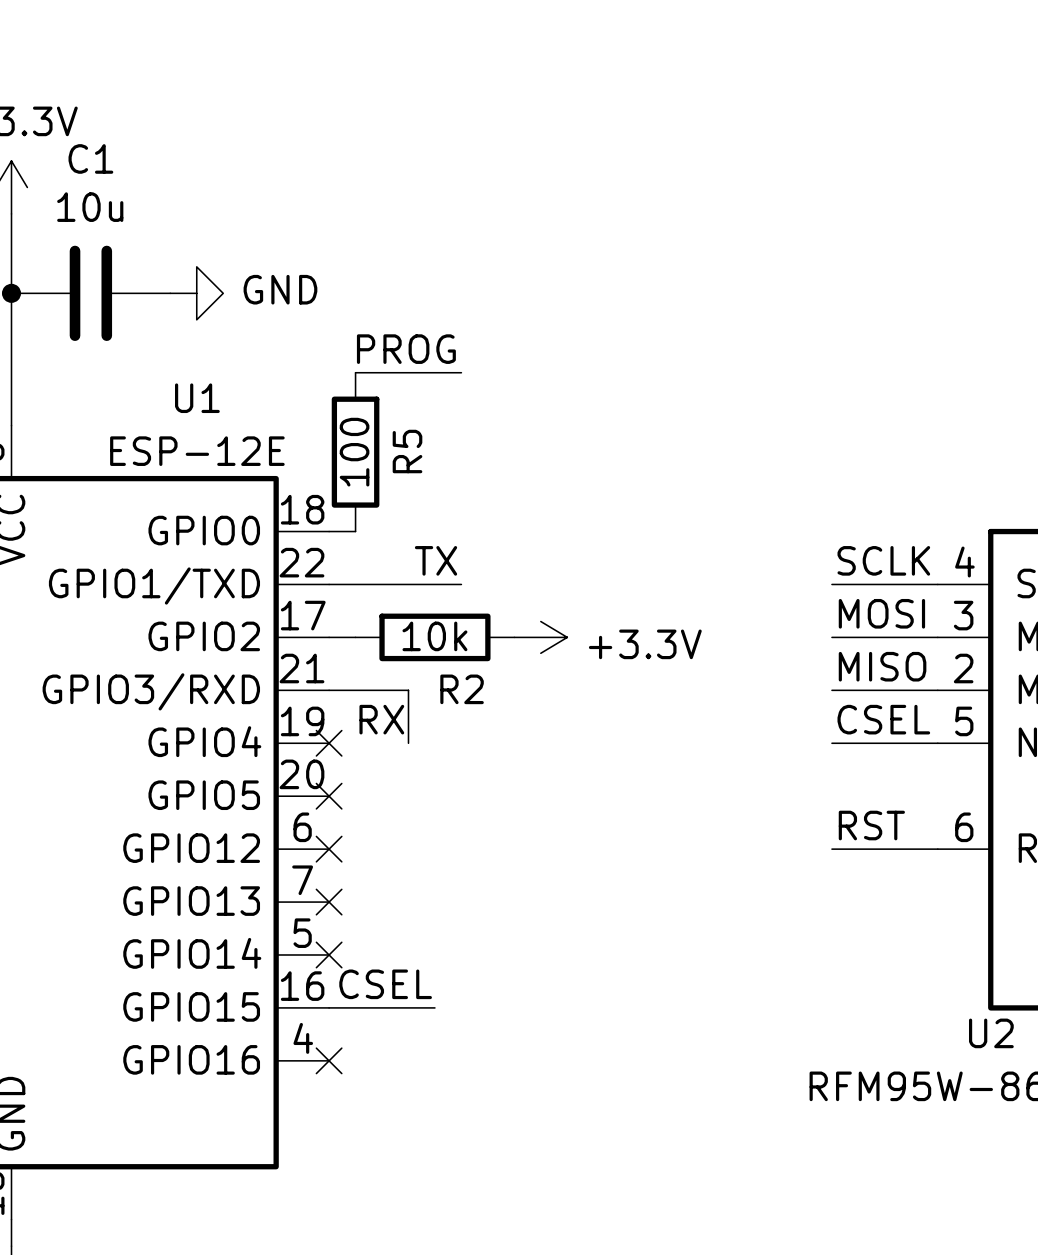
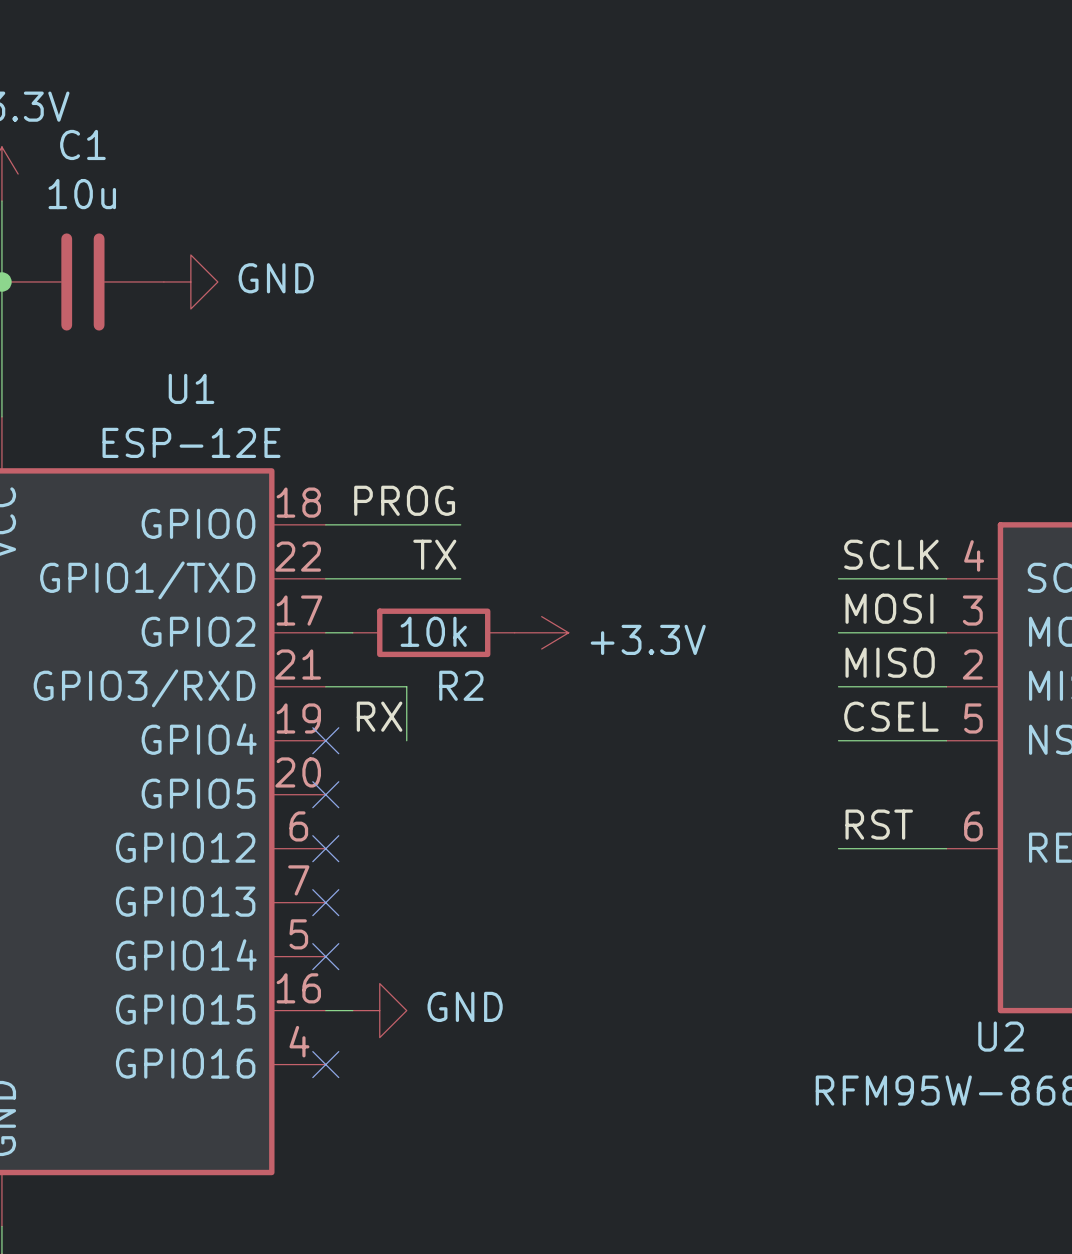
label position: PROG (406, 349) -> PROG (404, 500)
wire: (355, 372) (461, 372) -> (352, 524) (460, 524)
R5: 100 (355, 452) -> none
label: CSEL (385, 984) -> none
wire: (355, 1007) (434, 1007) -> none
power symbol: none -> GND (379, 1010)

